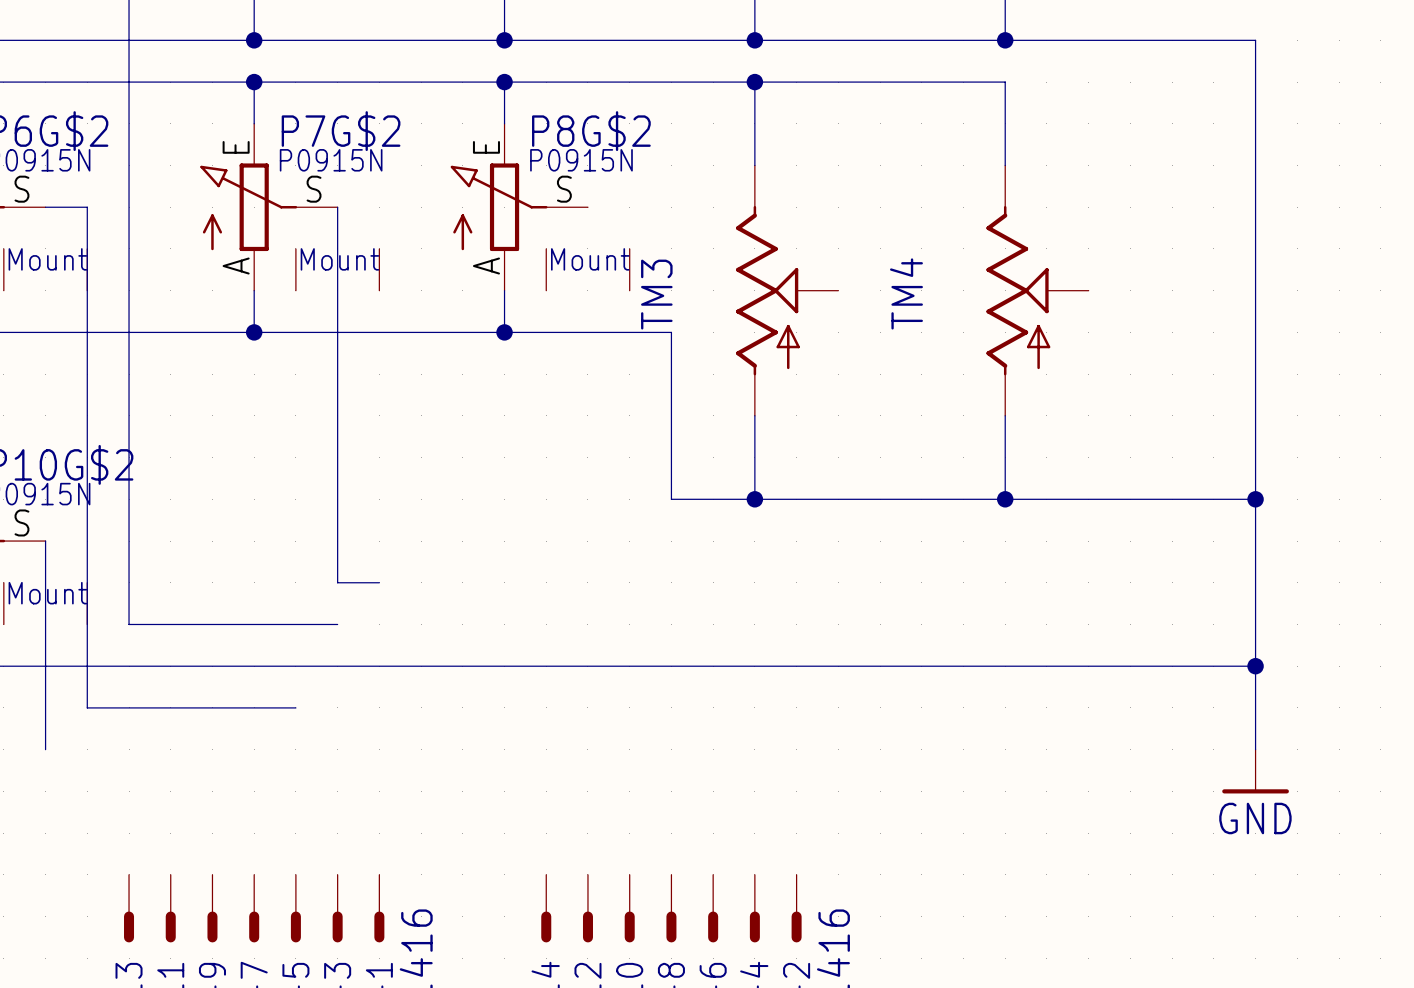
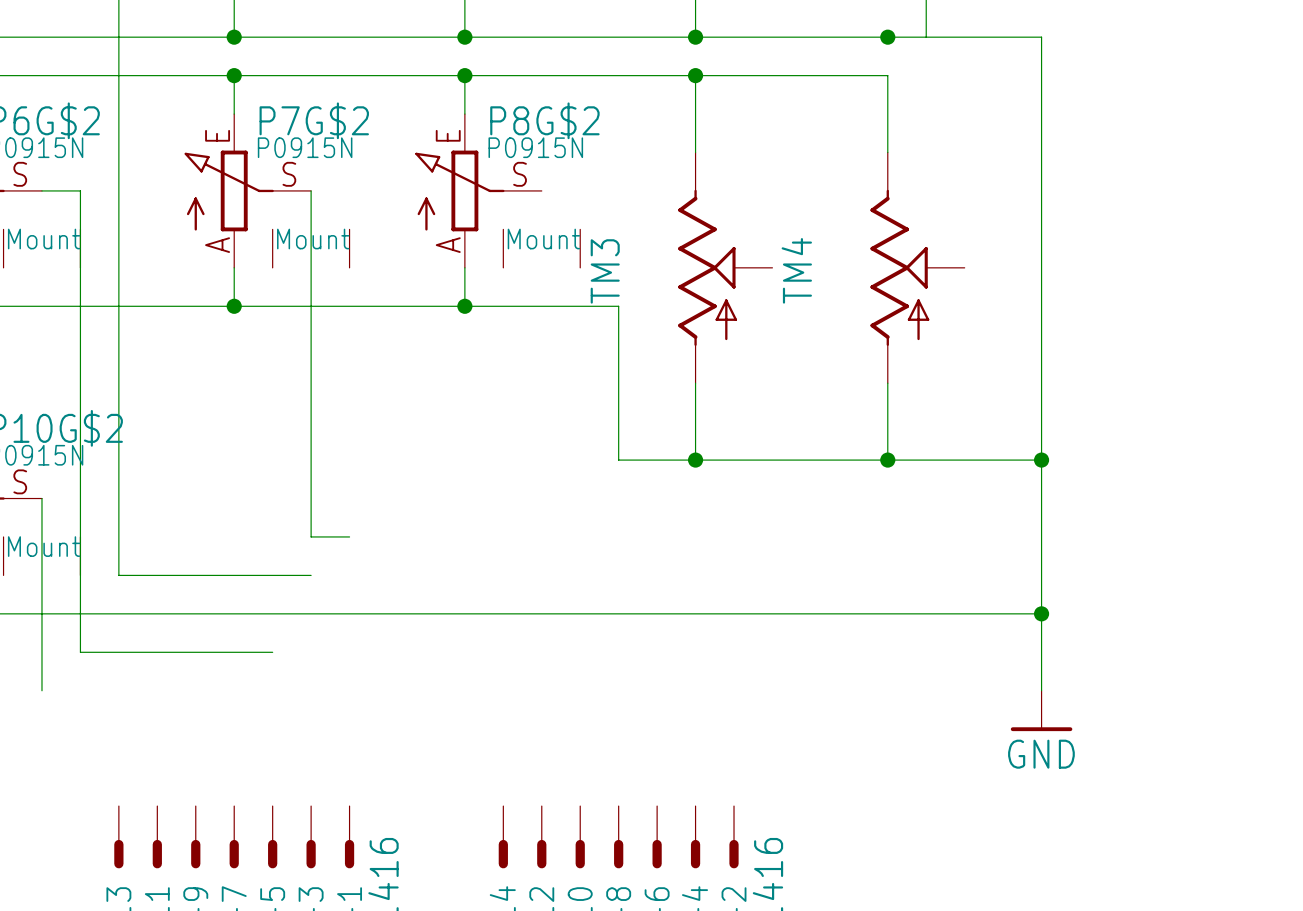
junction position: (1005, 40) -> (887, 37)
wire: (1130, 40) (1255, 40) (1255, 749) -> (1041, 37) (1041, 690)
wire: (963, 82) (1005, 82) (1005, 165) -> (887, 75) (887, 152)
TM4 position: (1037, 290) -> (917, 267)
wire: (1005, 415) (1005, 499) -> (887, 383) (887, 460)
junction position: (1005, 499) -> (887, 460)
wire: (1130, 499) (1255, 499) -> none
junction: none -> (1041, 460)
junction: (1255, 499) -> none
wire: (1130, 666) (1255, 666) -> none
junction: none -> (1041, 613)
junction: (1255, 666) -> none
power symbol position: GND (1255, 771) -> GND (1041, 710)

